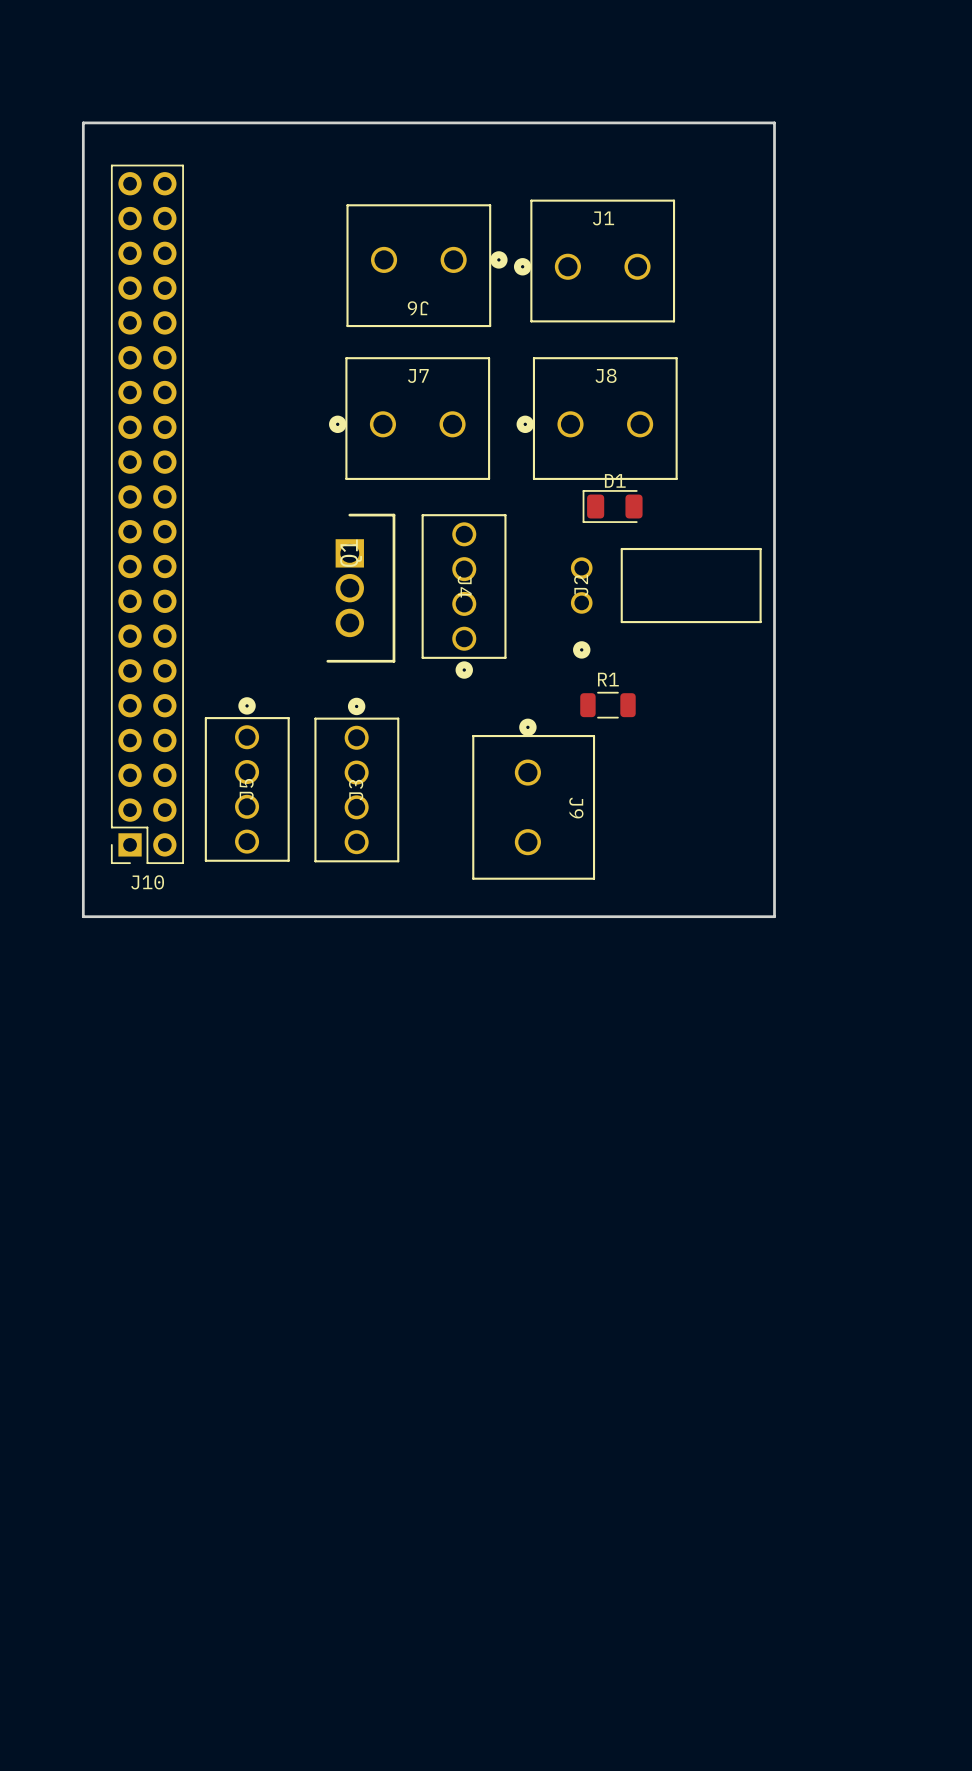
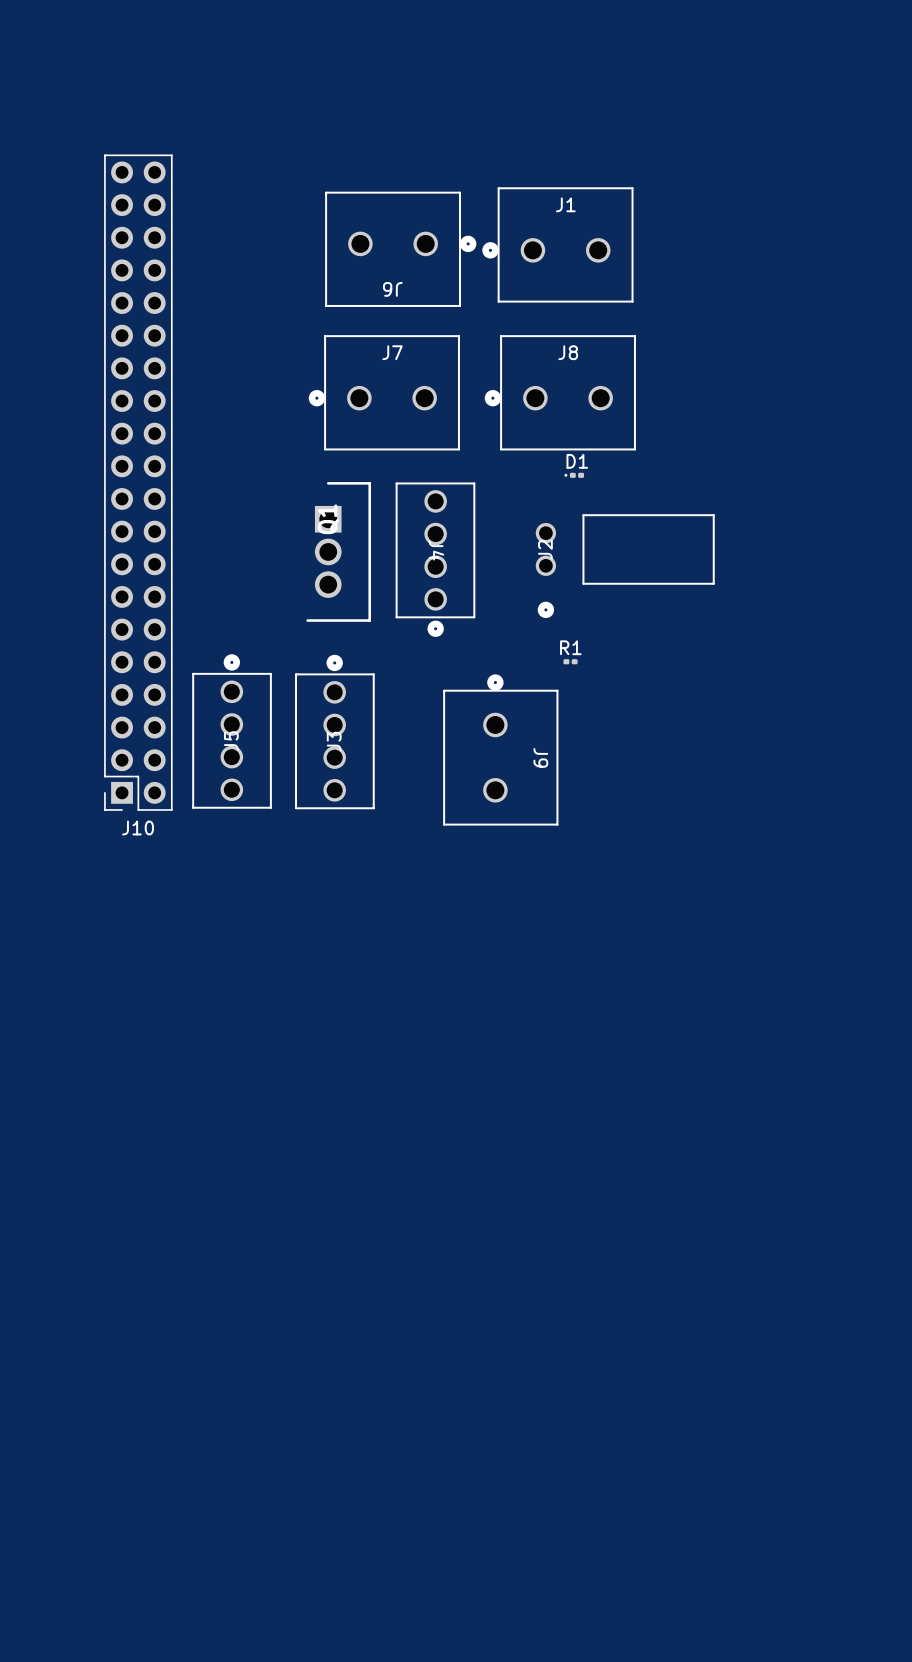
board edge: (83, 122) (774, 122) (774, 916) (83, 916) (83, 122) -> none
D1 footprint: [582, 490, 643, 523] -> [564, 472, 585, 478]
R1 footprint: [580, 691, 636, 719] -> [563, 659, 578, 665]

